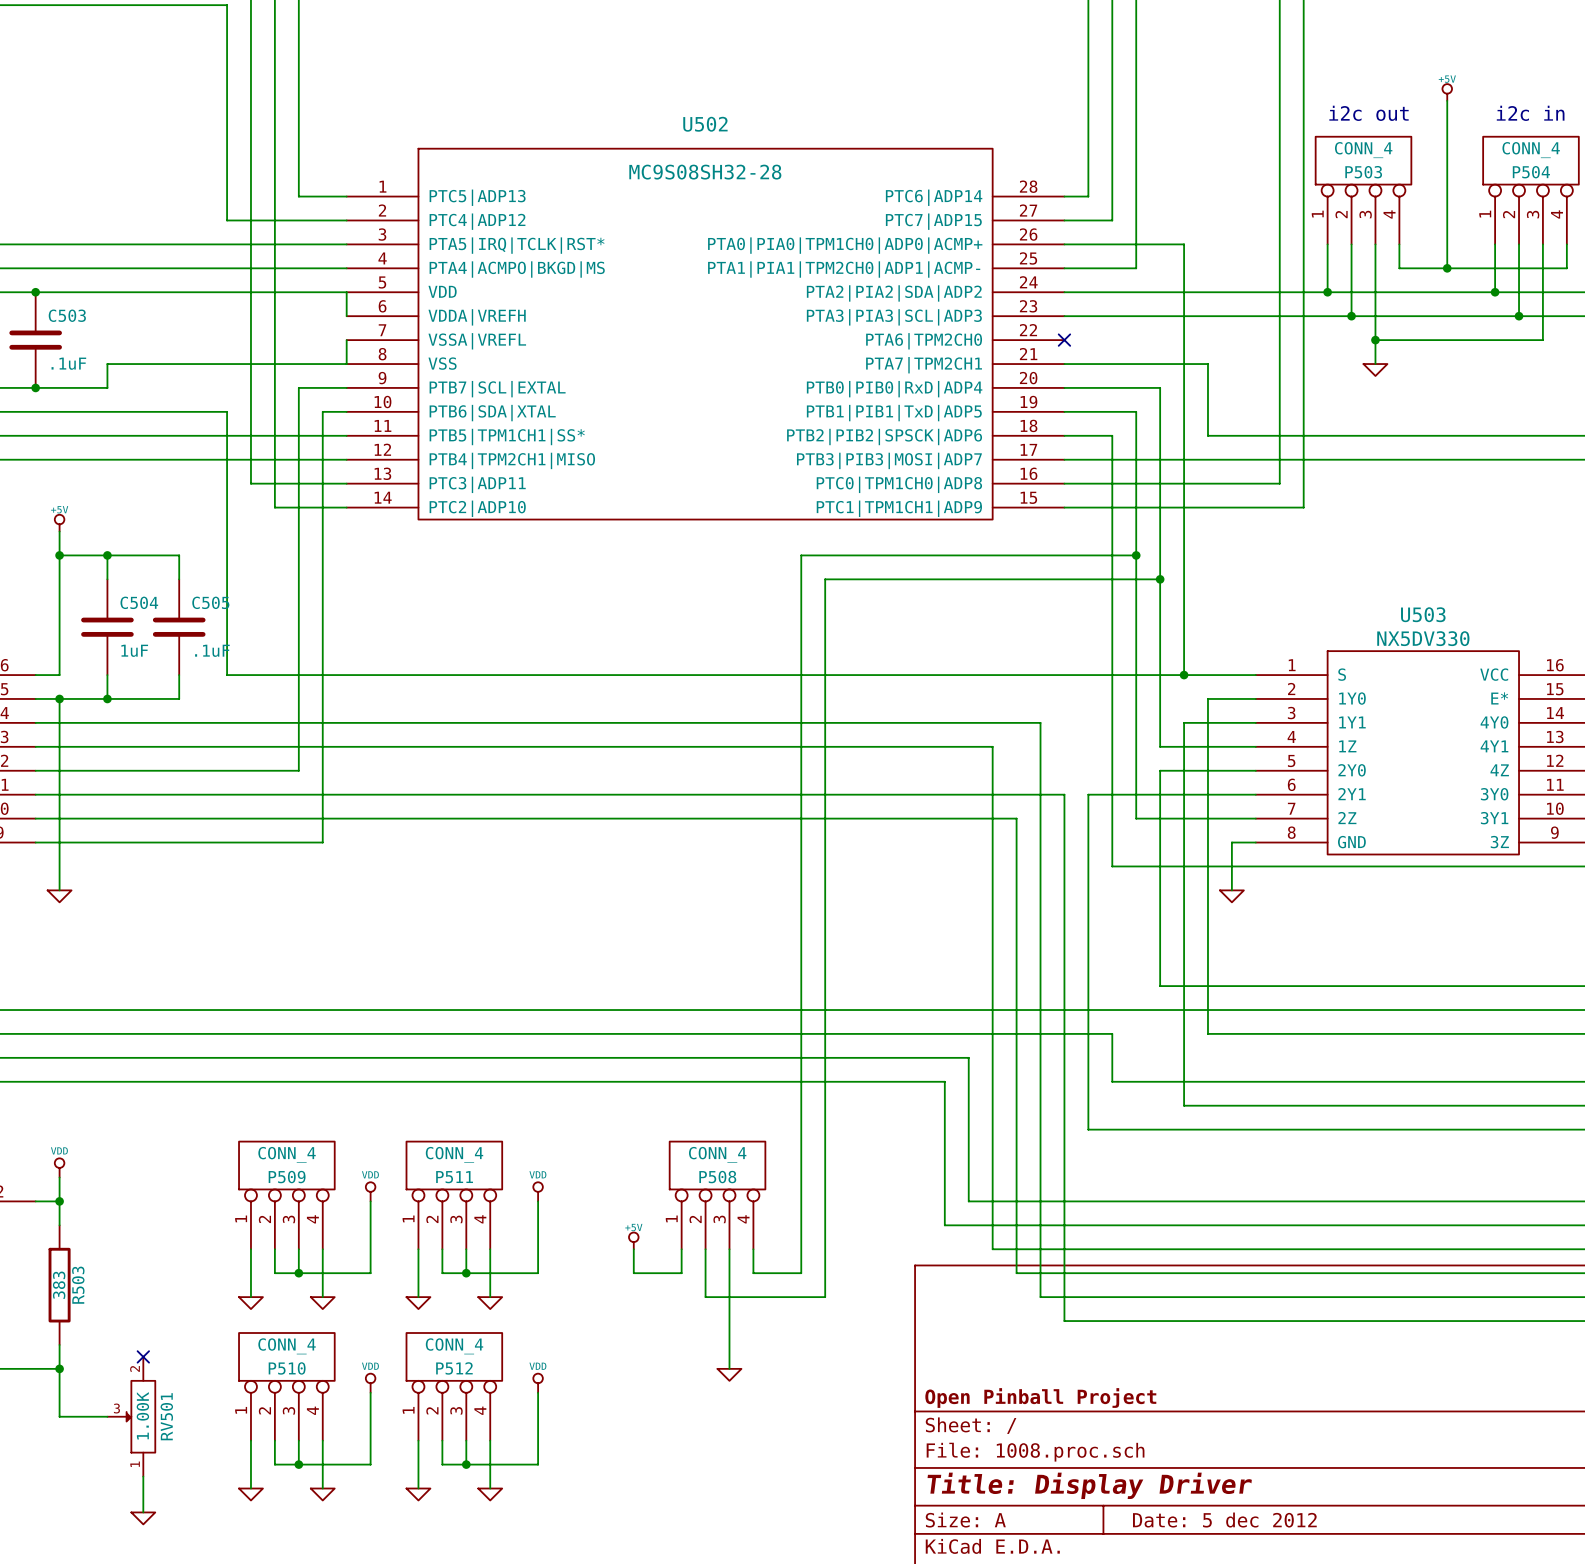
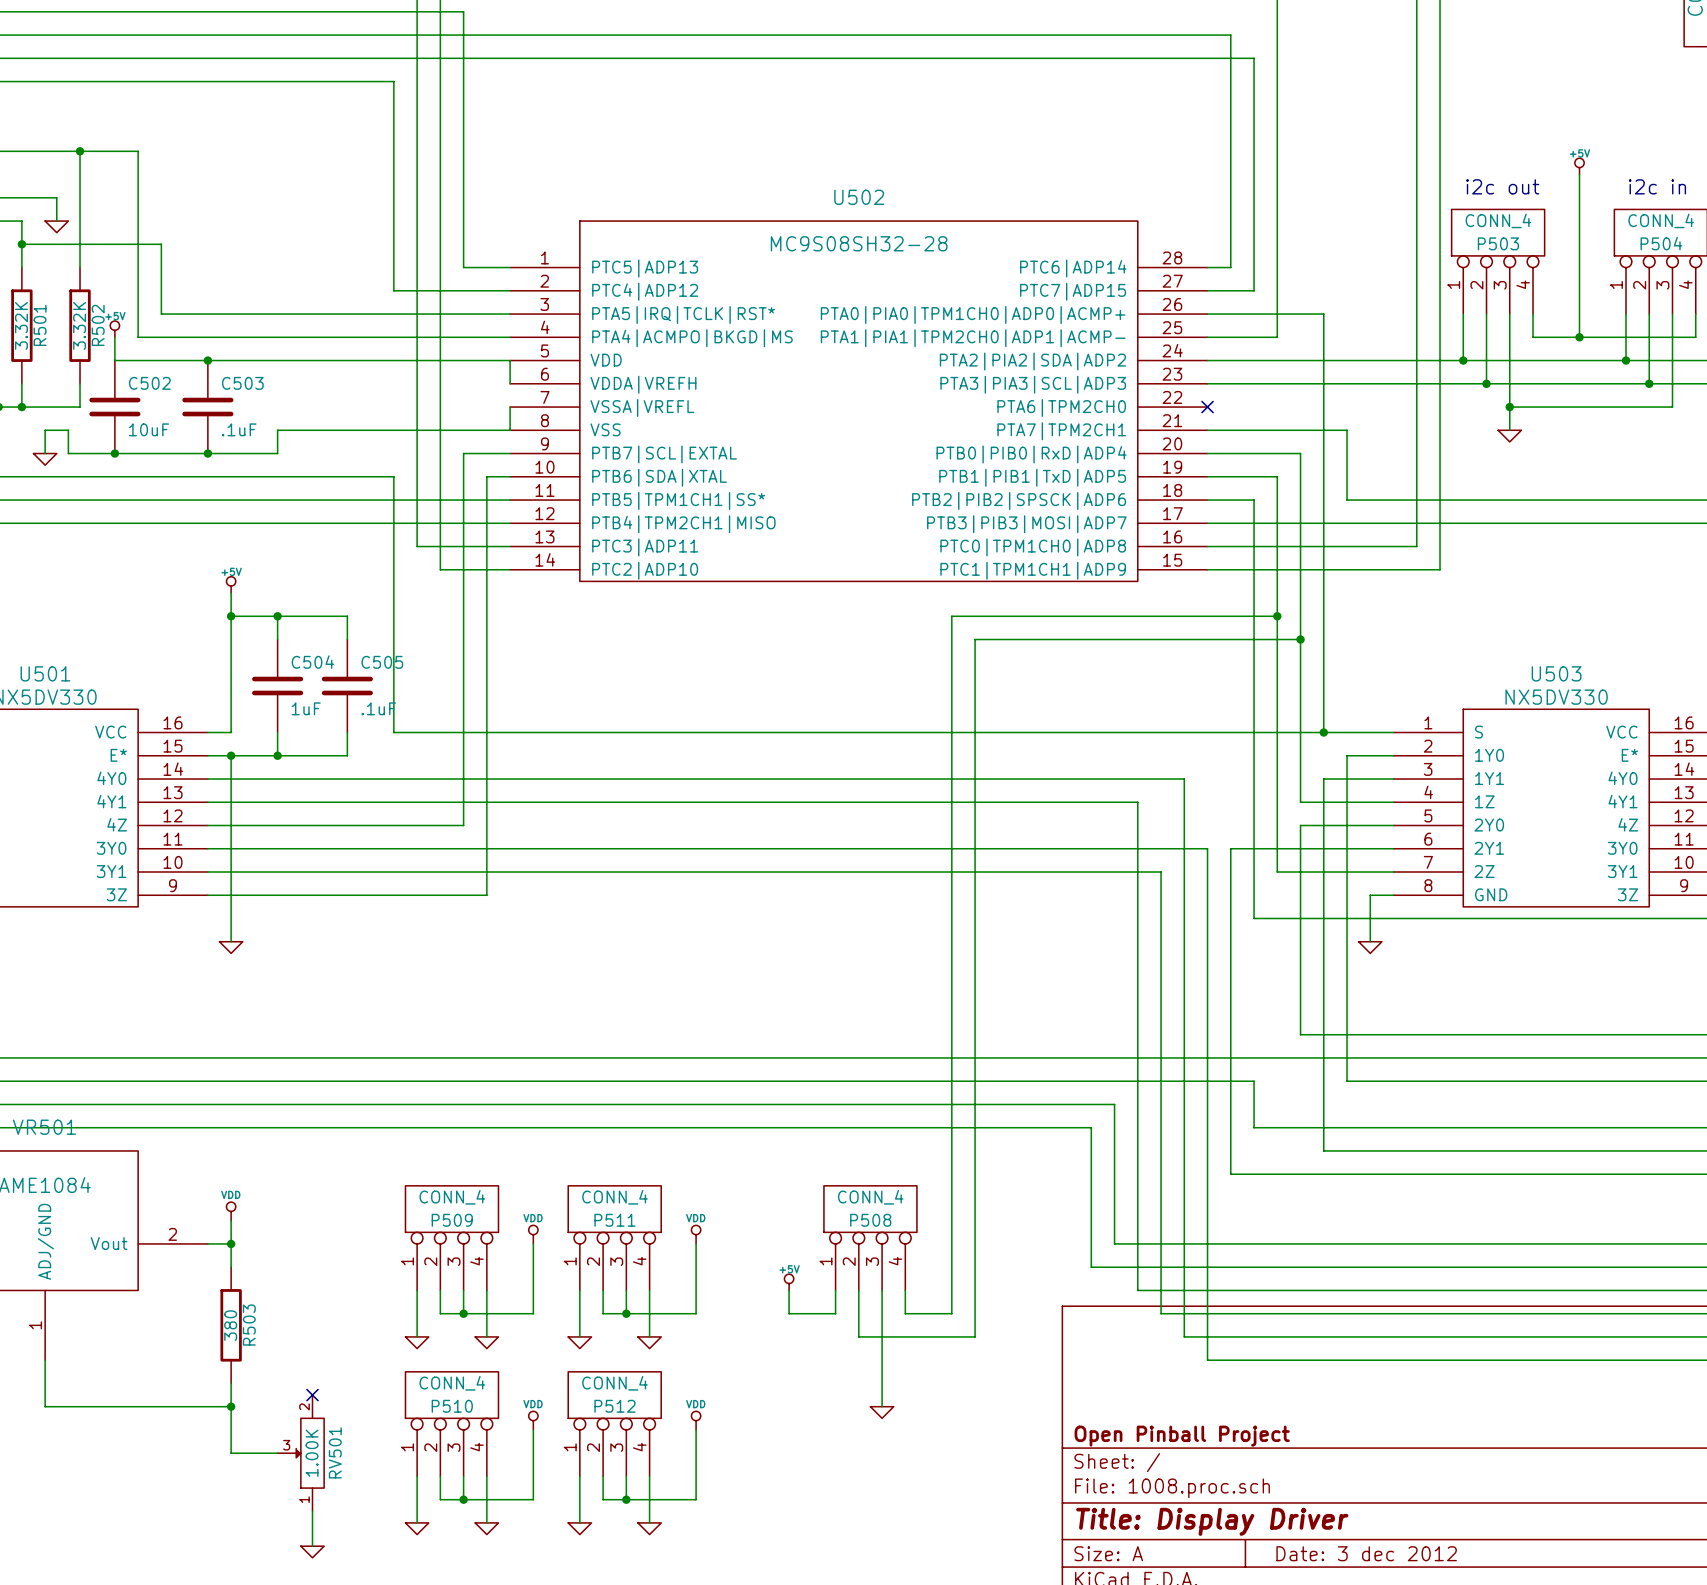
R503 value: 383 (59, 1285) -> 380 (230, 1325)
title block: Date: 5 dec 2012 (1224, 1520) -> Date: 3 dec 2012 (1366, 1553)

